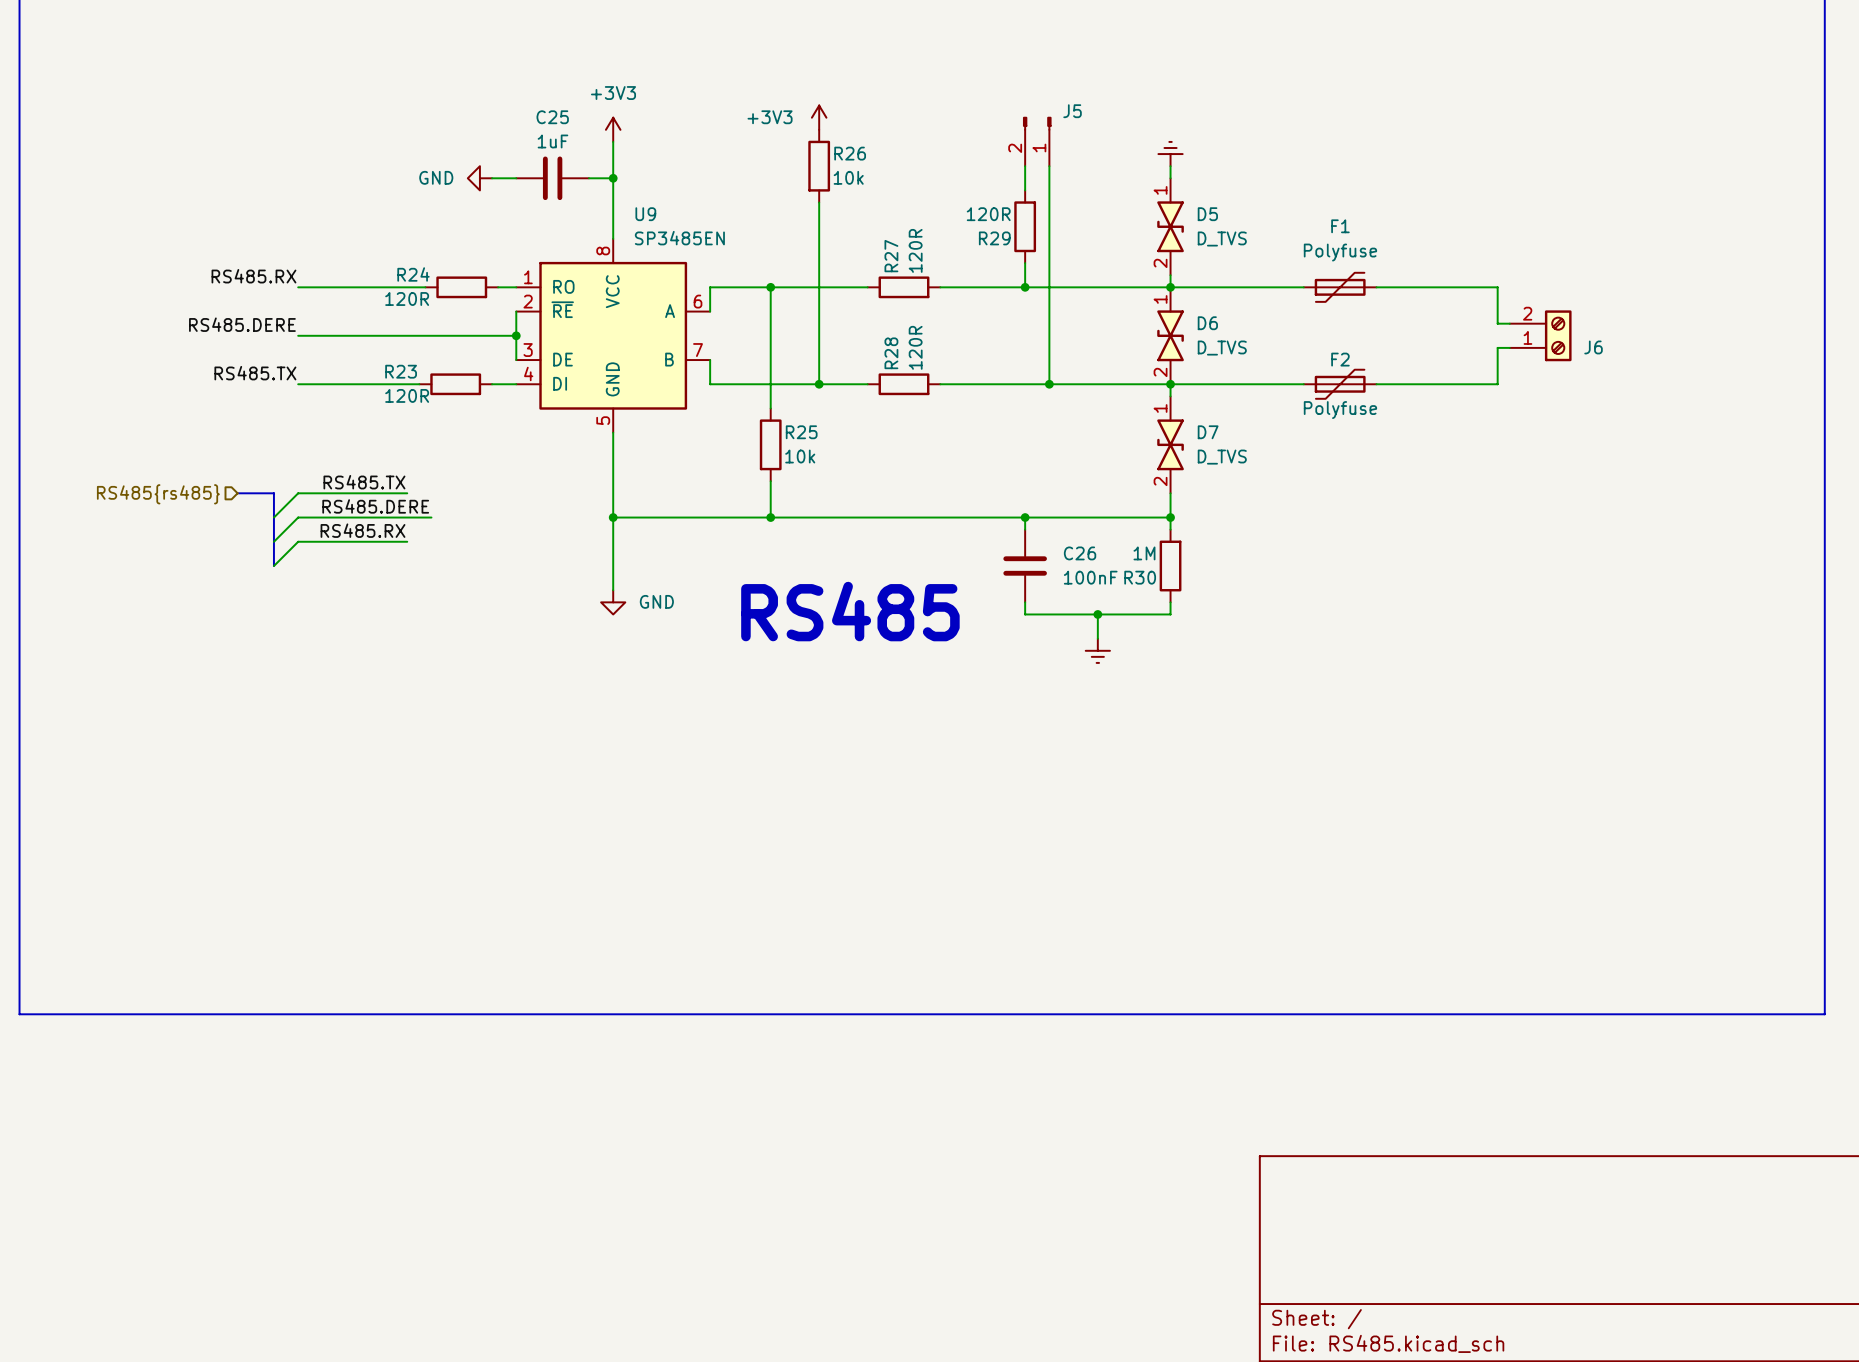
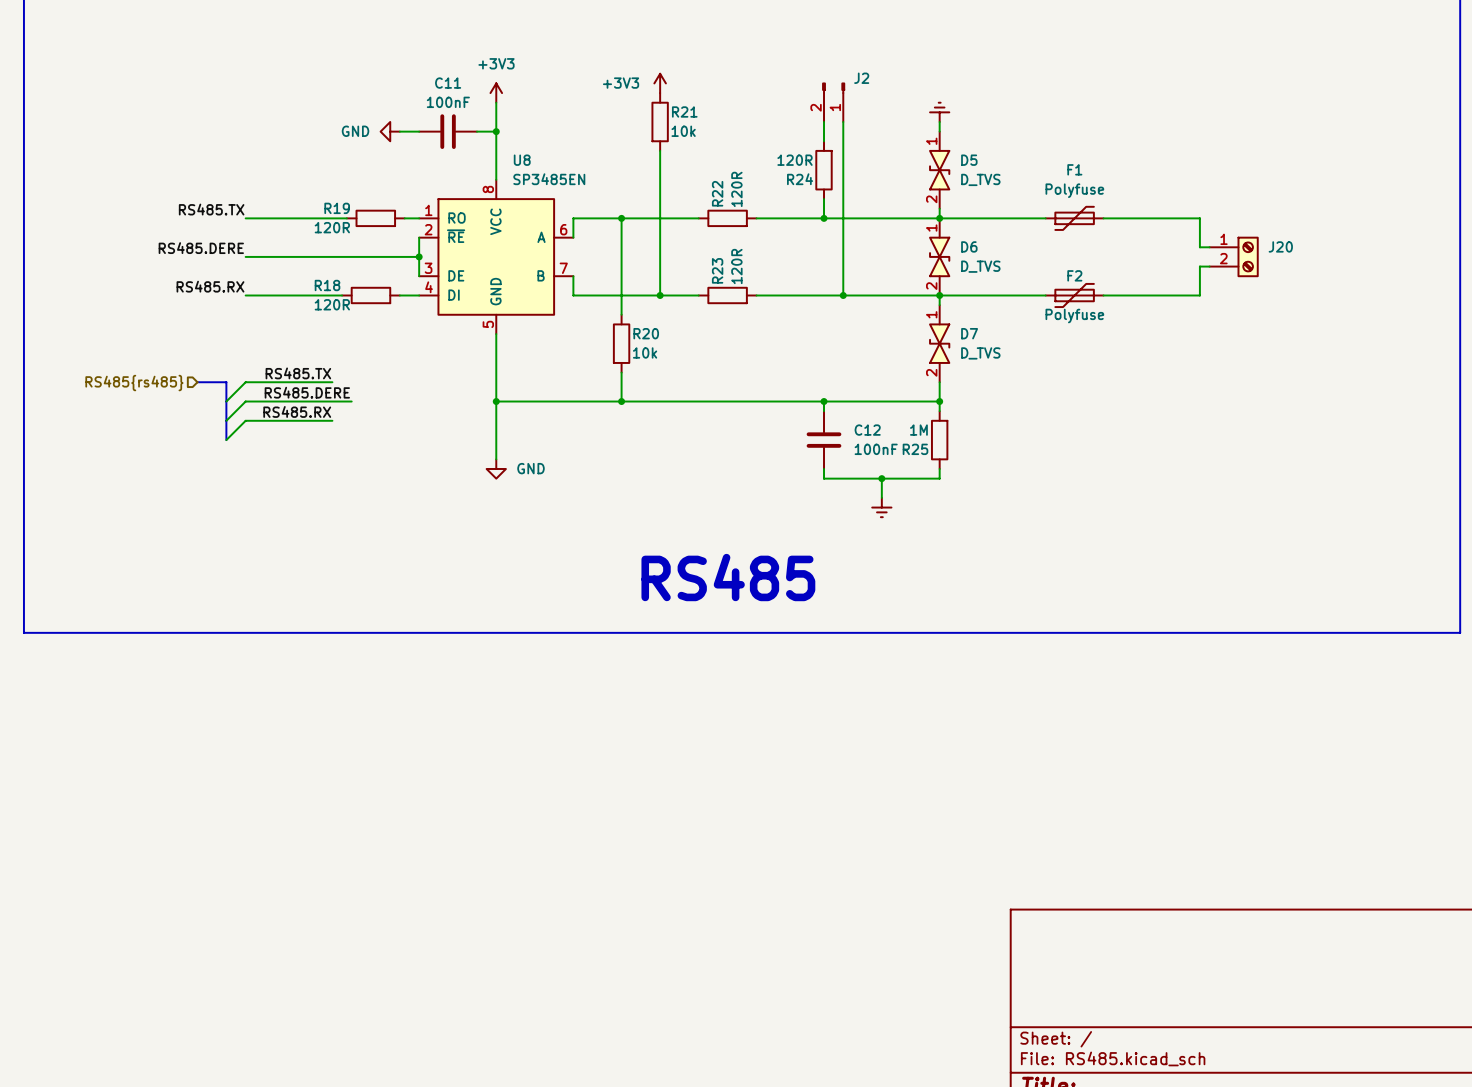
J5 name: J5 (1072, 111) -> J2 (861, 78)
C25 name: C25 (552, 117) -> C11 (448, 83)
C25 value: 1uF (552, 141) -> 100nF (448, 102)
R26 name: R26 (850, 153) -> R21 (684, 111)
U9 name: U9 (645, 214) -> U8 (522, 160)
R29 name: R29 (994, 238) -> R24 (800, 179)
R27 name: R27 (891, 256) -> R22 (717, 193)
R24 name: R24 (413, 274) -> R19 (337, 208)
label: RS485.RX (253, 276) -> RS485.TX (211, 209)
J6: (1540, 335) -> none
J20: none -> (1234, 256)
R28 name: R28 (891, 353) -> R23 (717, 270)
R23 name: R23 (401, 371) -> R18 (327, 285)
label: RS485.TX (255, 373) -> RS485.RX (210, 286)
R25 name: R25 (801, 432) -> R20 (646, 333)
C26 name: C26 (1080, 553) -> C12 (867, 430)
R30 name: R30 (1140, 577) -> R25 (915, 449)
text position: RS485 (850, 611) -> RS485 (728, 577)
line: (19, 808) (19, 1014) (1824, 1014) (1824, 808) -> (23, 632) (1460, 632)

